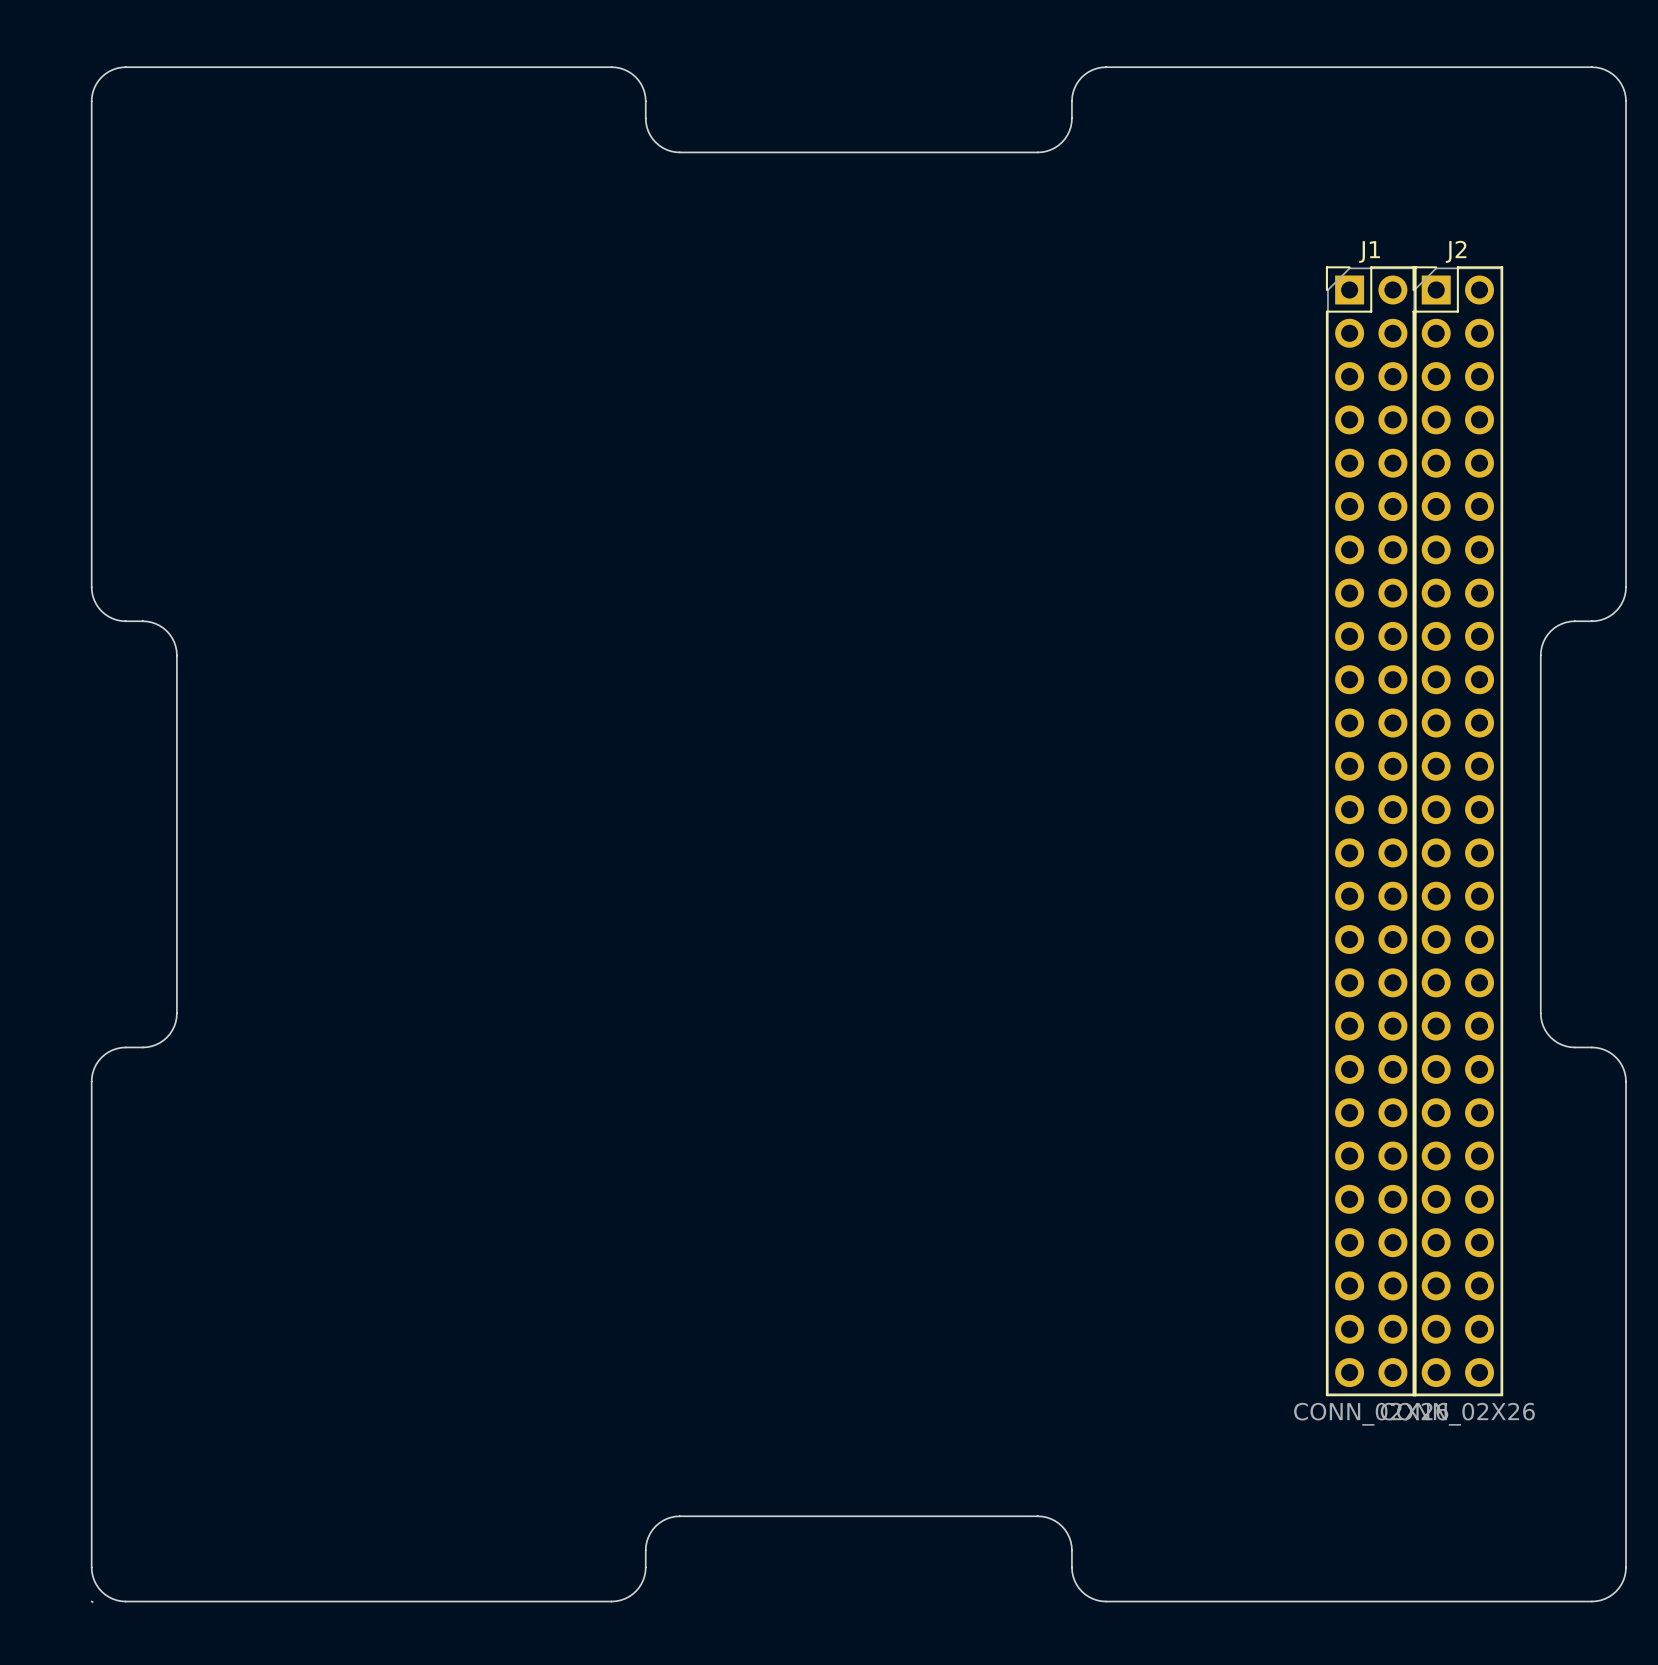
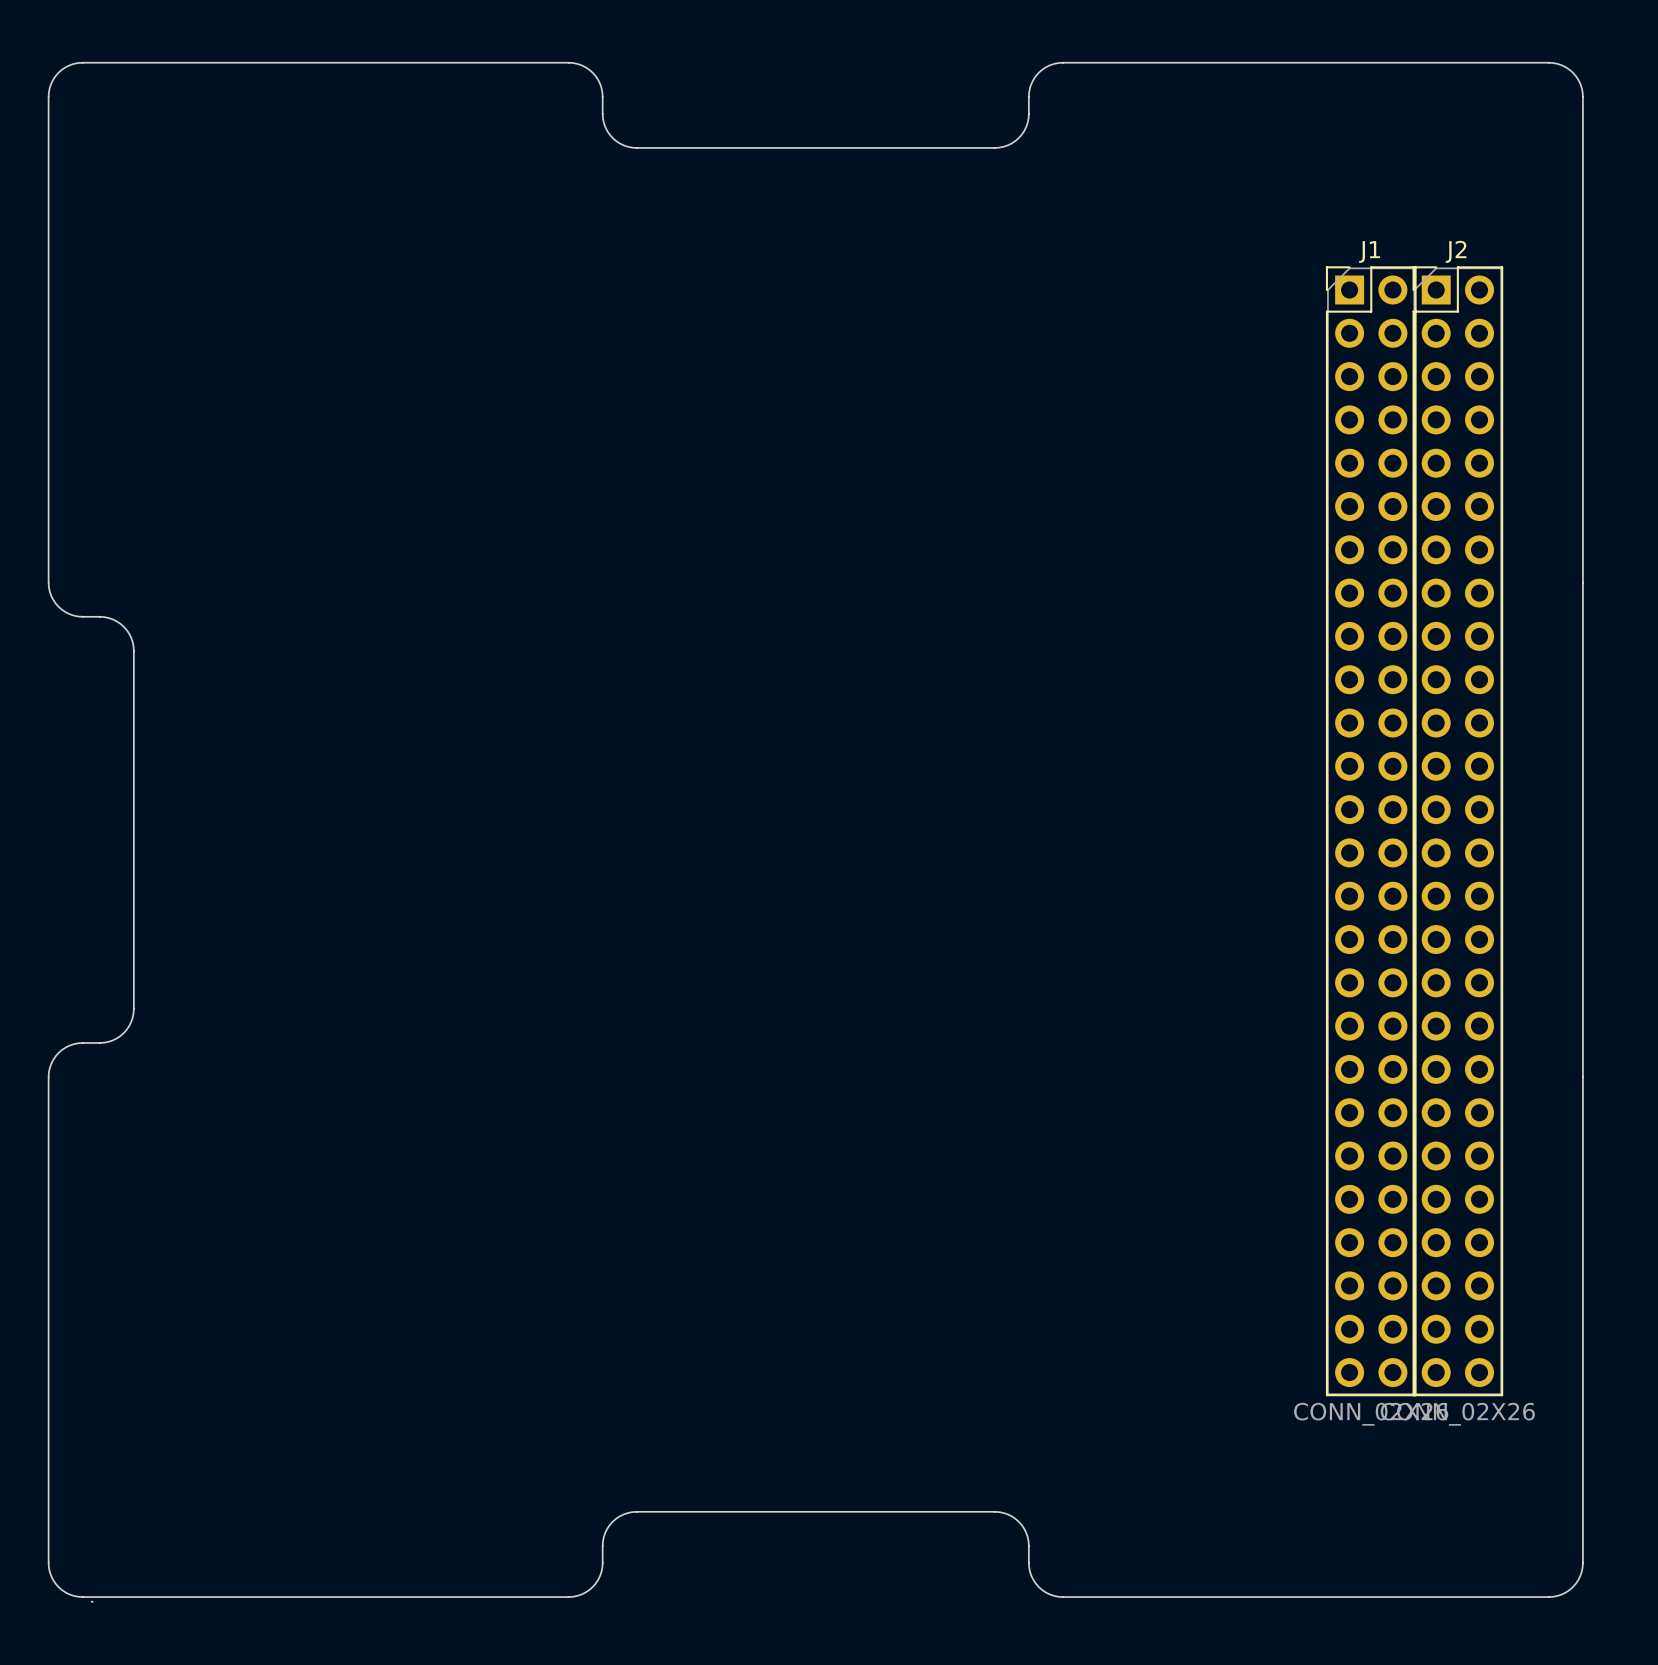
board edge: (125, 67) (616, 67) (632, 74) (641, 84) (645, 96) (646, 127) (652, 139) (666, 149) (679, 152) (1046, 151) (1058, 145) (1069, 131) (1071, 122) (1072, 96) (1076, 84) (1085, 74) (1101, 67) (1591, 67) (1604, 69) (1616, 77) (1623, 88) (1626, 101) (1625, 591) (1618, 607) (1608, 616) (1596, 620) (1566, 622) (1554, 628) (1543, 642) (1540, 655) (1541, 1022) (1550, 1037) (1561, 1044) (1570, 1047) (1596, 1047) (1608, 1052) (1618, 1060) (1625, 1077) (1626, 1567) (1623, 1580) (1616, 1591) (1604, 1598) (1591, 1601) (1101, 1601) (1085, 1594) (1076, 1584) (1072, 1571) (1070, 1541) (1064, 1529) (1050, 1518) (1037, 1516) (671, 1517) (655, 1526) (648, 1537) (646, 1545) (645, 1571) (641, 1584) (632, 1594) (616, 1601) (125, 1601) (112, 1598) (101, 1591) (94, 1580) (91, 1567) (91, 1077) (96, 1064) (108, 1052) (121, 1047) (151, 1046) (163, 1040) (172, 1030) (176, 1013) (175, 646) (169, 634) (155, 623) (147, 621) (121, 620) (105, 614) (96, 604) (91, 587) (91, 96) (96, 84) (105, 74) (116, 68) (125, 67) -> (82, 62) (69, 65) (61, 69) (53, 79) (48, 92) (48, 582) (51, 595) (61, 609) (78, 616) (104, 617) (112, 619) (126, 630) (132, 642) (133, 1008) (131, 1021) (120, 1035) (108, 1041) (78, 1043) (65, 1047) (53, 1060) (48, 1072) (48, 1562) (51, 1576) (58, 1587) (69, 1594) (82, 1597) (573, 1596) (585, 1592) (598, 1580) (602, 1567) (603, 1537) (609, 1525) (623, 1514) (636, 1511) (1003, 1512) (1015, 1518) (1026, 1532) (1028, 1541) (1029, 1567) (1033, 1580) (1045, 1592) (1058, 1596) (1548, 1597) (1561, 1594) (1572, 1587) (1580, 1576) (1582, 1562) (1582, 96) (1580, 83) (1572, 72) (1561, 65) (1548, 62) (1058, 63) (1045, 67) (1033, 79) (1029, 92) (1028, 118) (1026, 126) (1015, 140) (1003, 146) (636, 147) (623, 145) (609, 134) (603, 122) (602, 92) (598, 79) (585, 67) (573, 63) (82, 62)

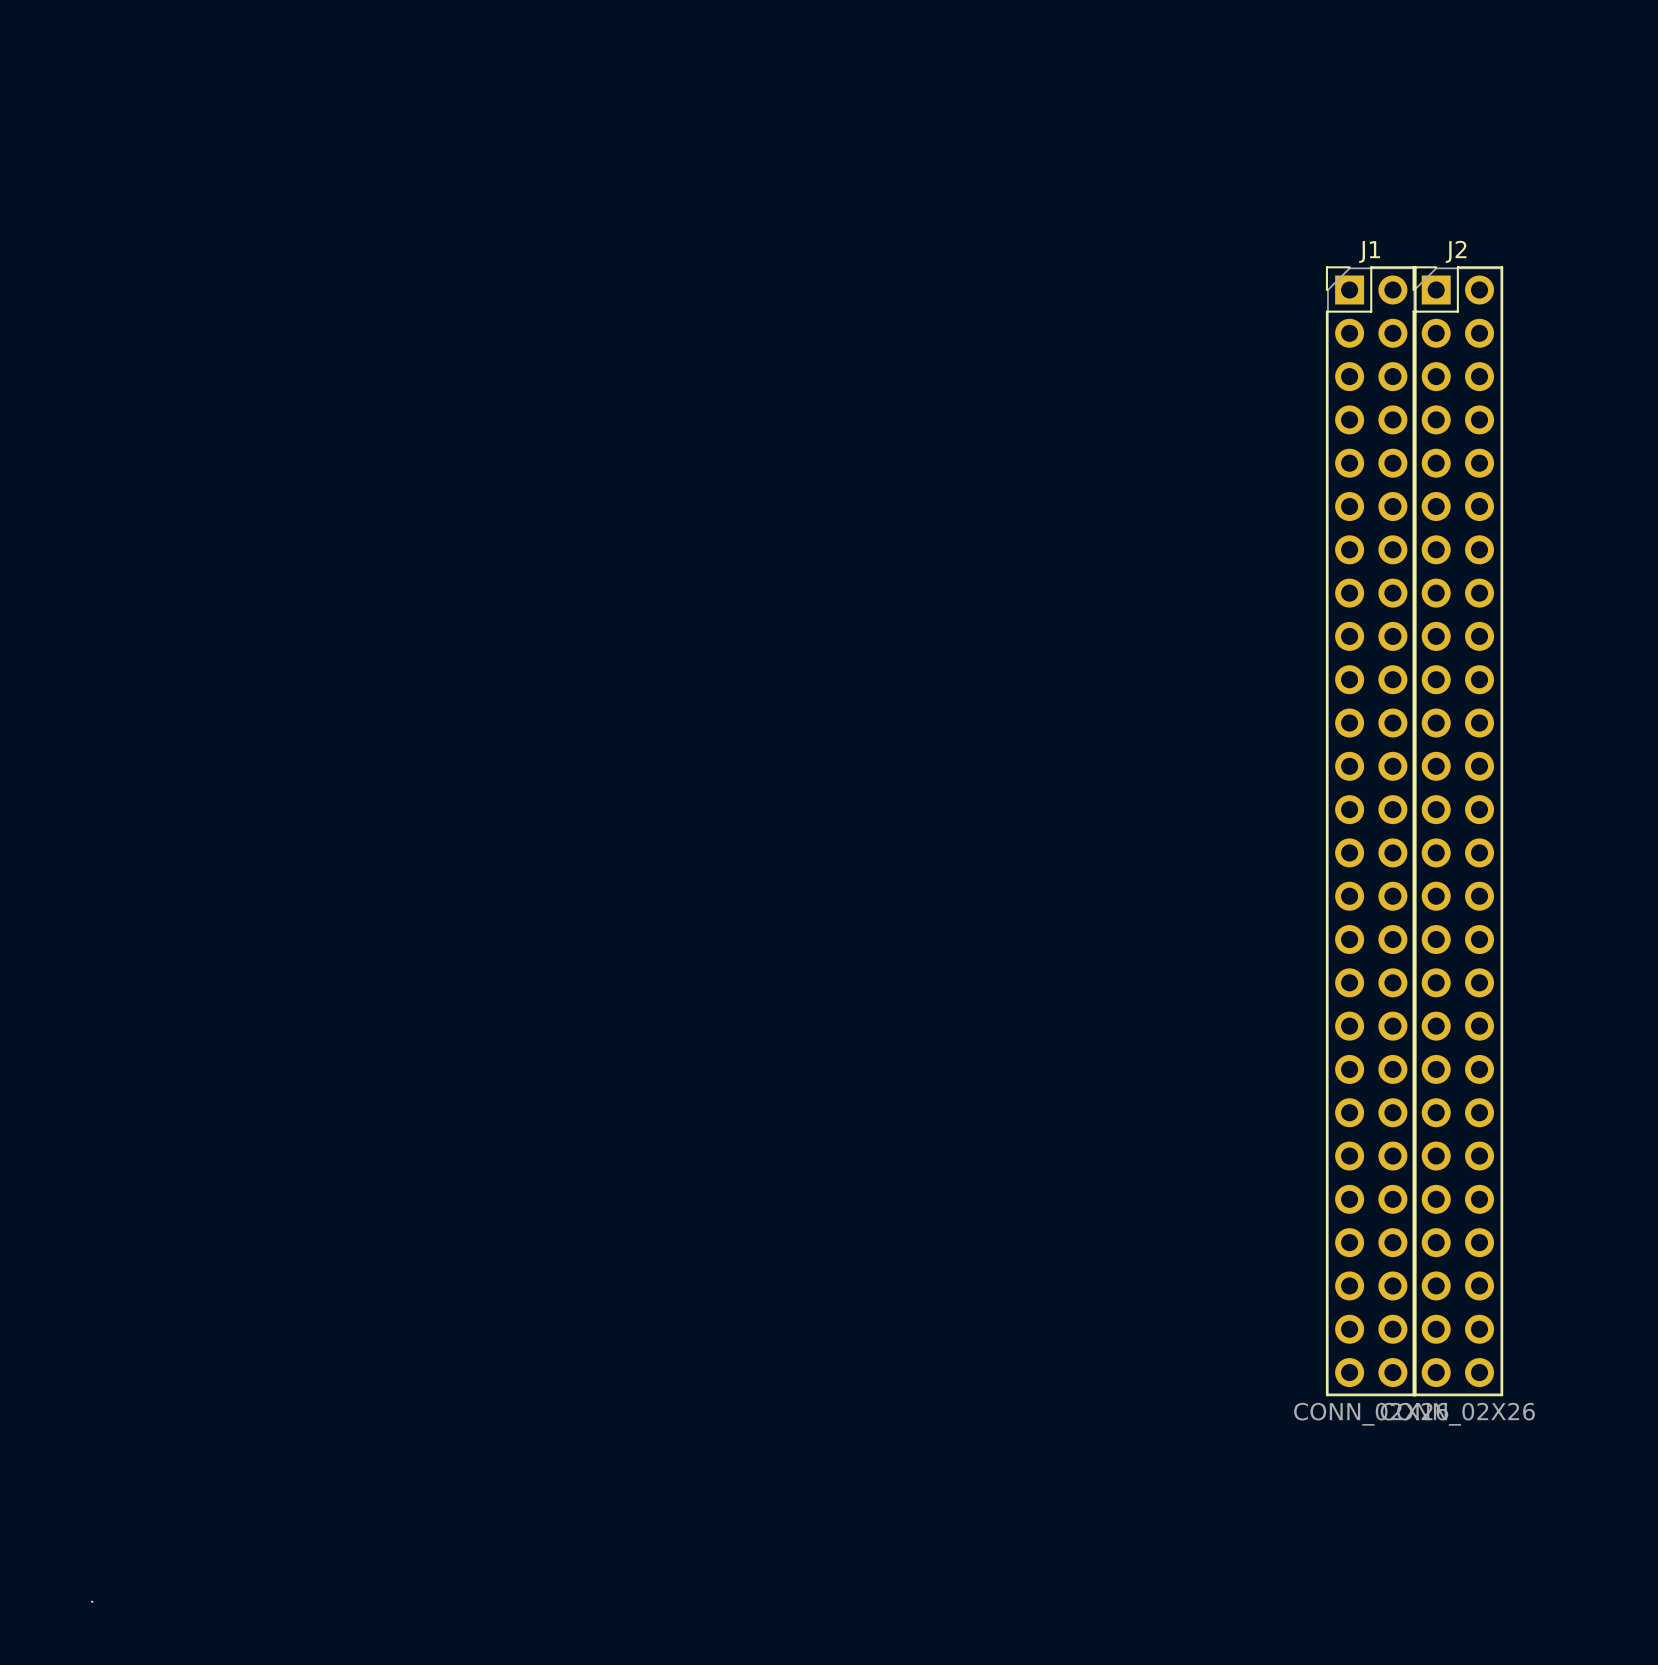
board edge: (82, 62) (573, 63) (585, 67) (598, 79) (602, 92) (603, 122) (609, 134) (623, 145) (636, 147) (1003, 146) (1015, 140) (1026, 126) (1028, 118) (1029, 92) (1033, 79) (1045, 67) (1058, 63) (1548, 62) (1561, 65) (1572, 72) (1580, 83) (1582, 96) (1582, 1562) (1580, 1576) (1572, 1587) (1561, 1594) (1548, 1597) (1058, 1596) (1045, 1592) (1033, 1580) (1029, 1567) (1027, 1537) (1021, 1525) (1007, 1514) (994, 1511) (627, 1512) (616, 1518) (605, 1532) (602, 1541) (602, 1567) (598, 1580) (585, 1592) (573, 1596) (82, 1597) (69, 1594) (58, 1587) (51, 1576) (48, 1562) (48, 1072) (53, 1060) (65, 1047) (78, 1043) (108, 1041) (120, 1035) (131, 1021) (133, 1008) (132, 642) (126, 630) (112, 619) (104, 617) (78, 616) (61, 609) (51, 595) (48, 582) (48, 92) (53, 79) (61, 69) (69, 65) (82, 62) -> none

